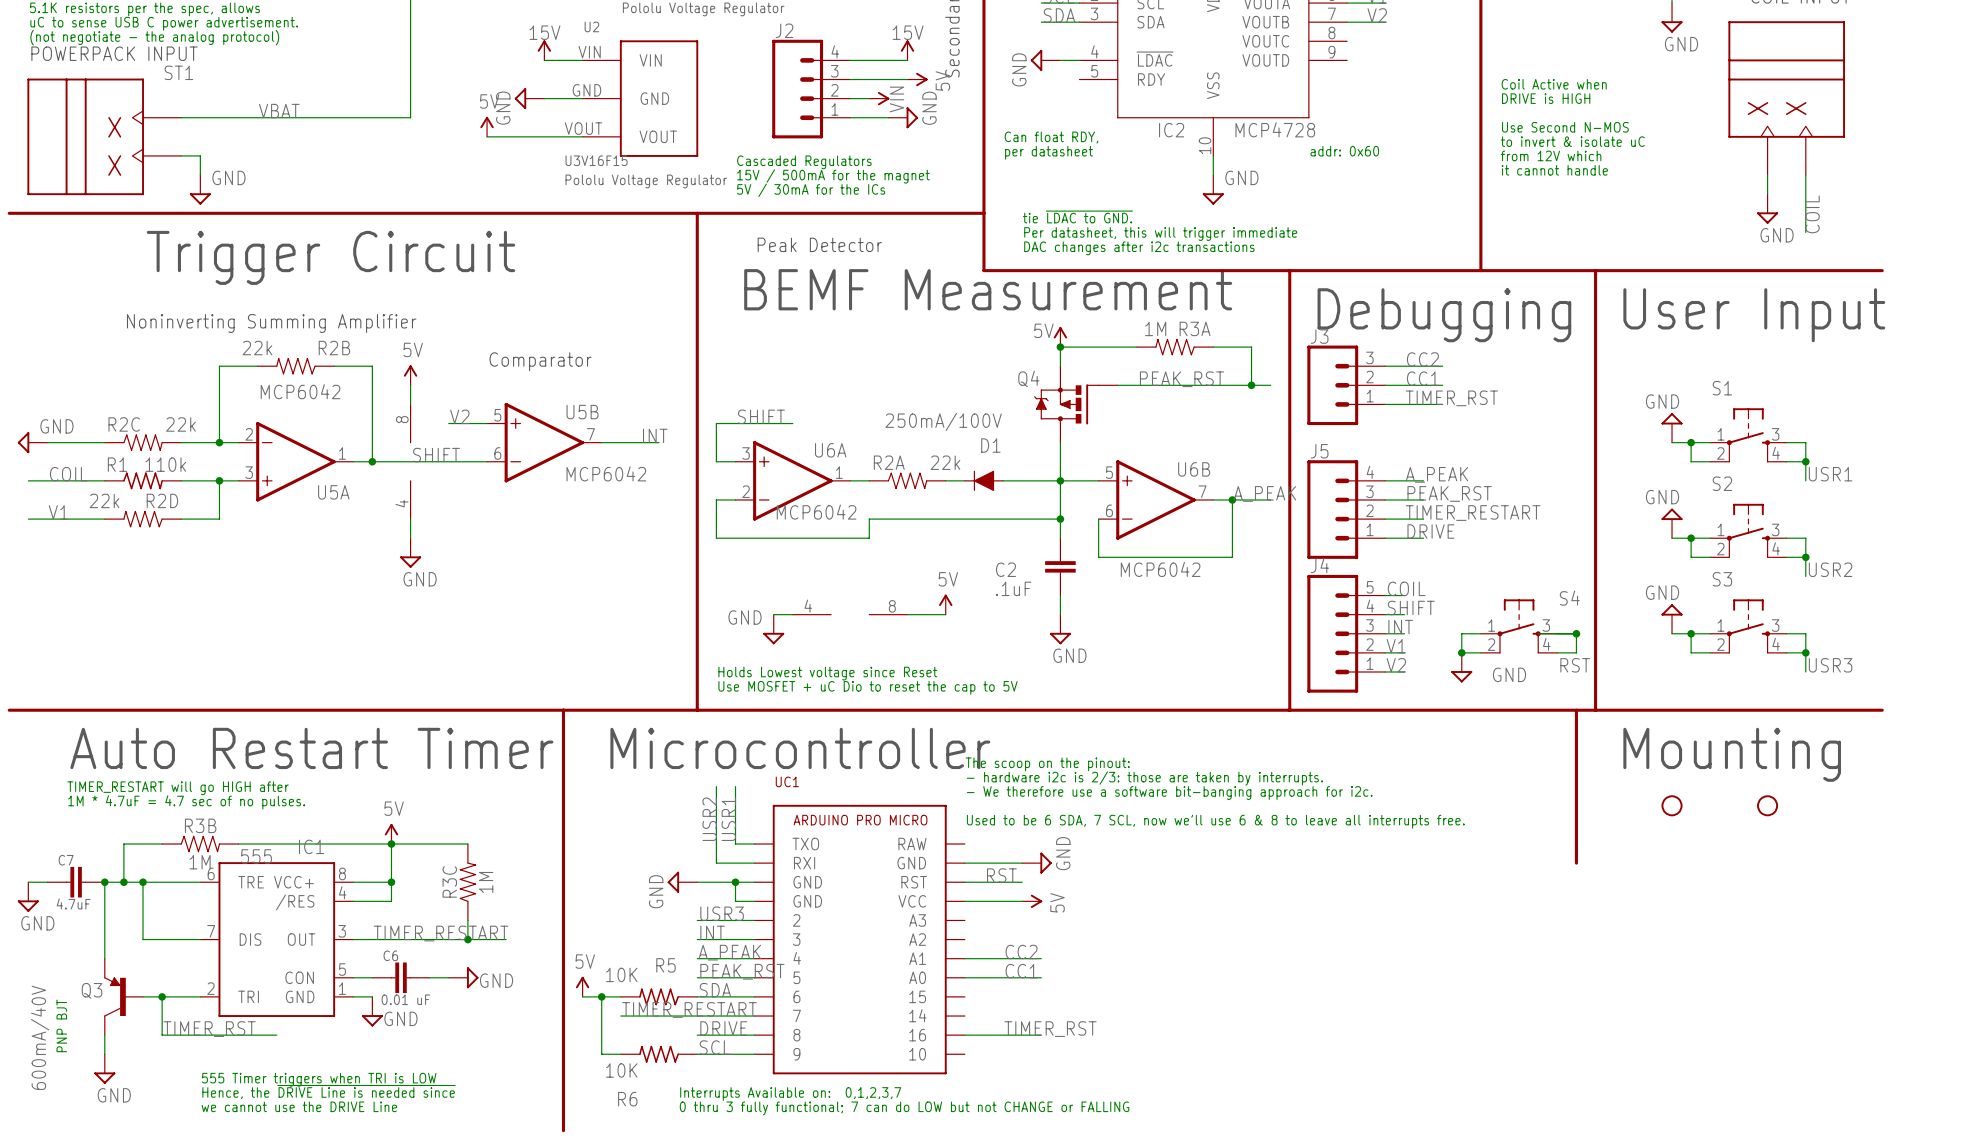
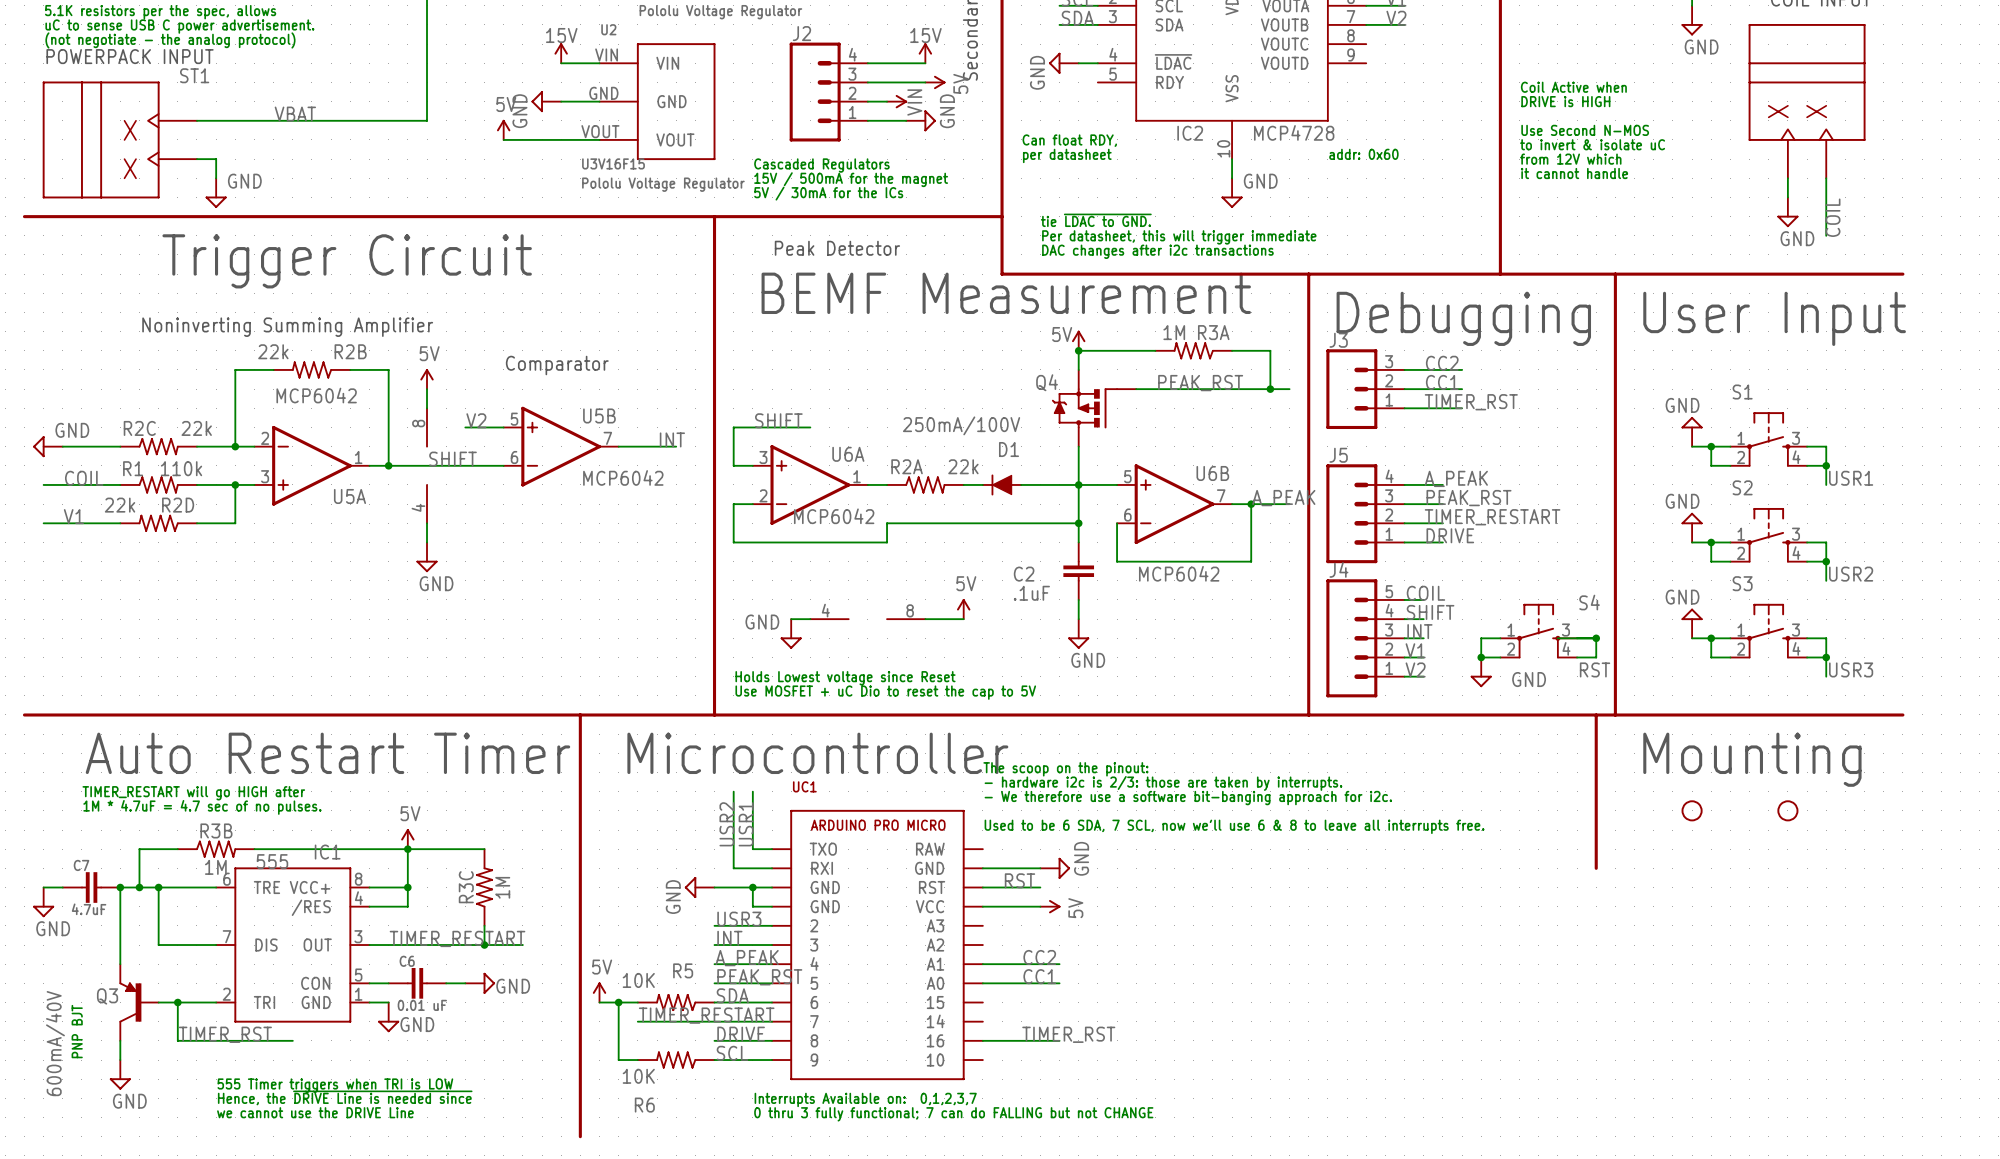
text position: Interrupts Available on: 0,1,2,3,7 (790, 1094) -> Interrupts Available on: 0,1,2,3,7 (865, 1099)
text: 0 thru 3 fully functional; 7 can do LOW but not CHANGE or FALLING (904, 1108) -> 0 thru 3 fully functional; 7 can do FALLING but not CHANGE (953, 1114)

